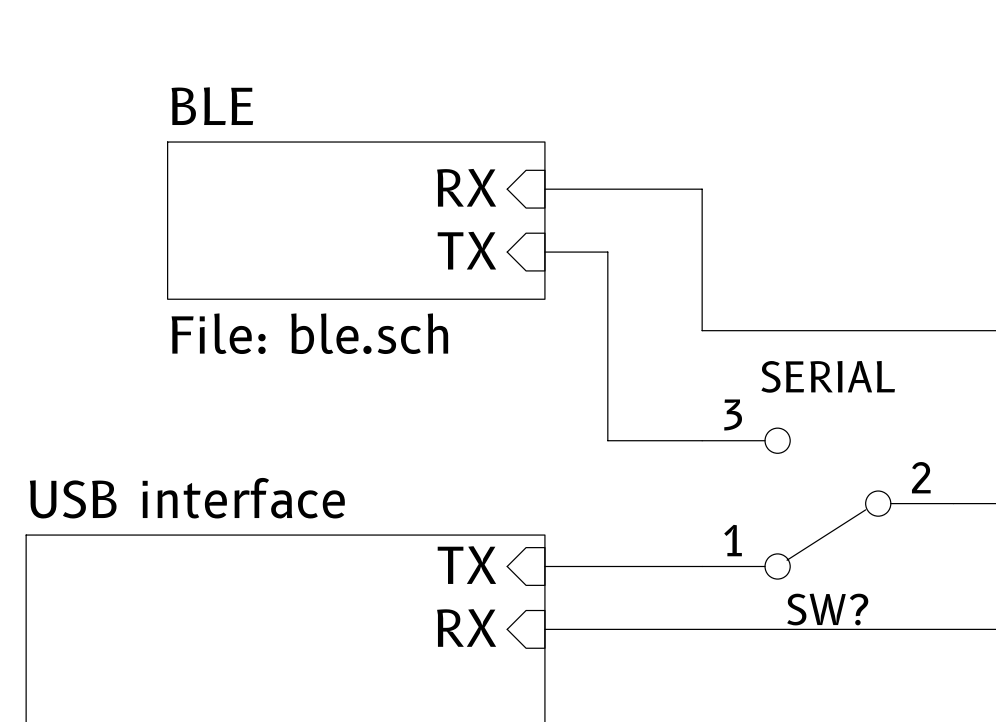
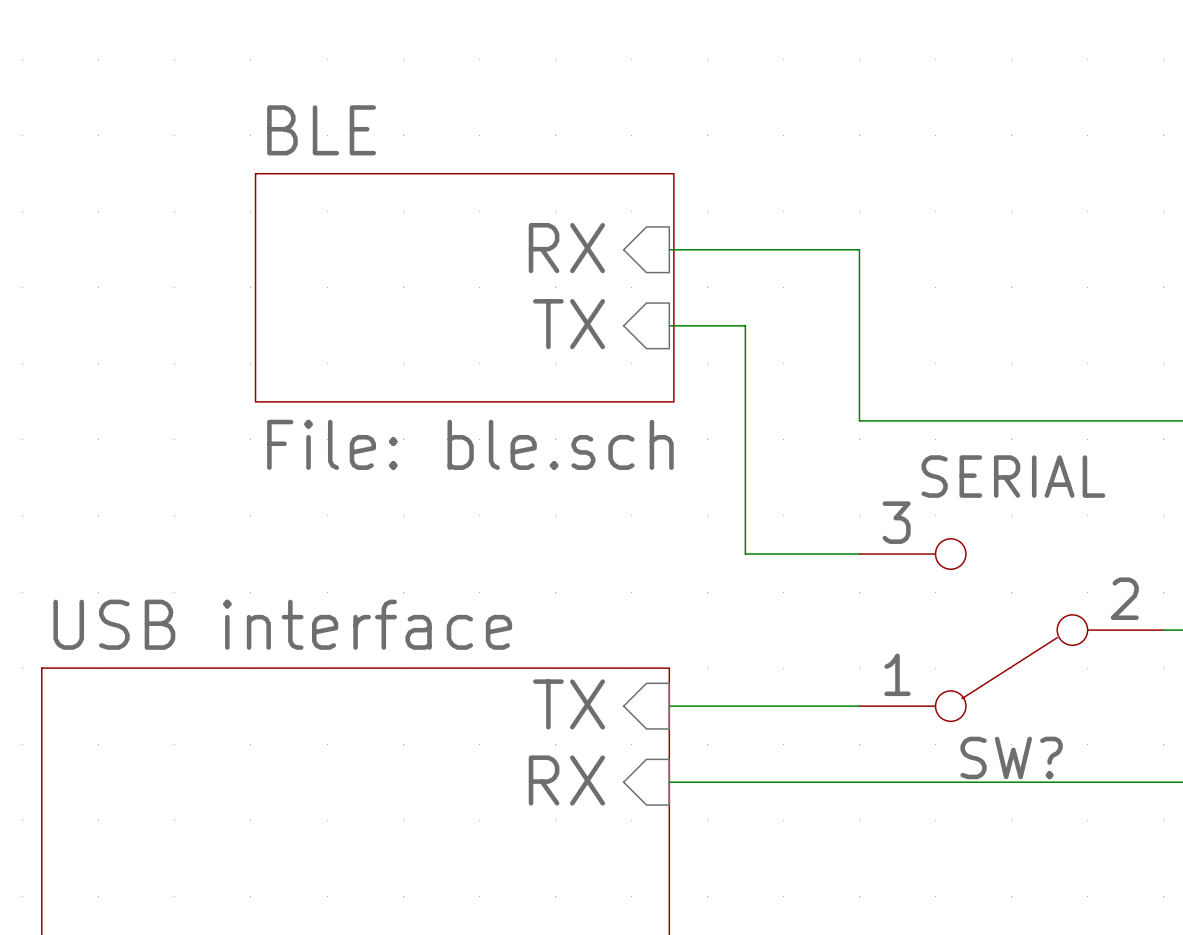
sheet BLE shape: [167, 142, 545, 300] -> [255, 173, 674, 402]

